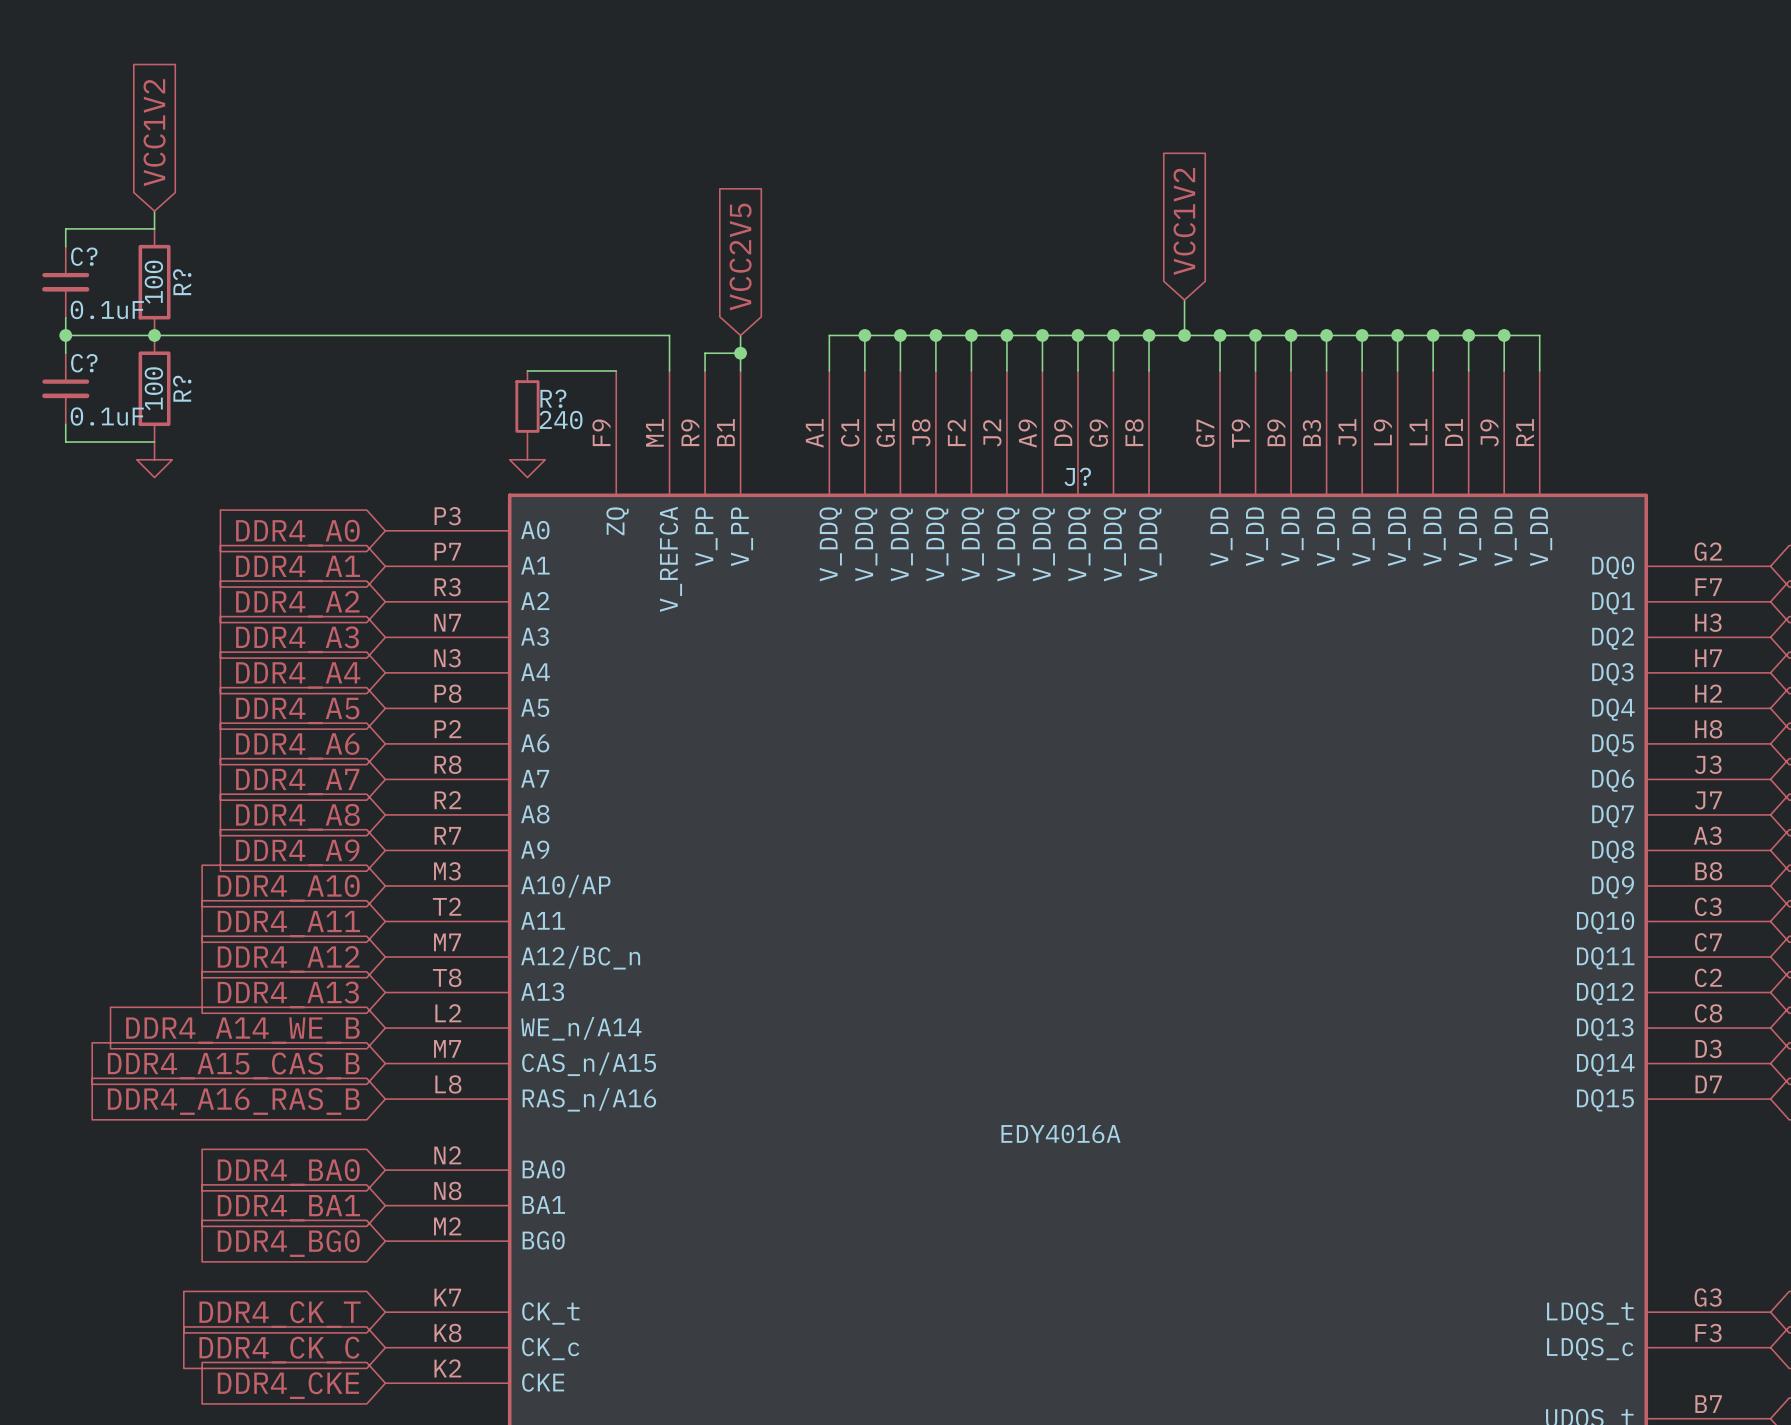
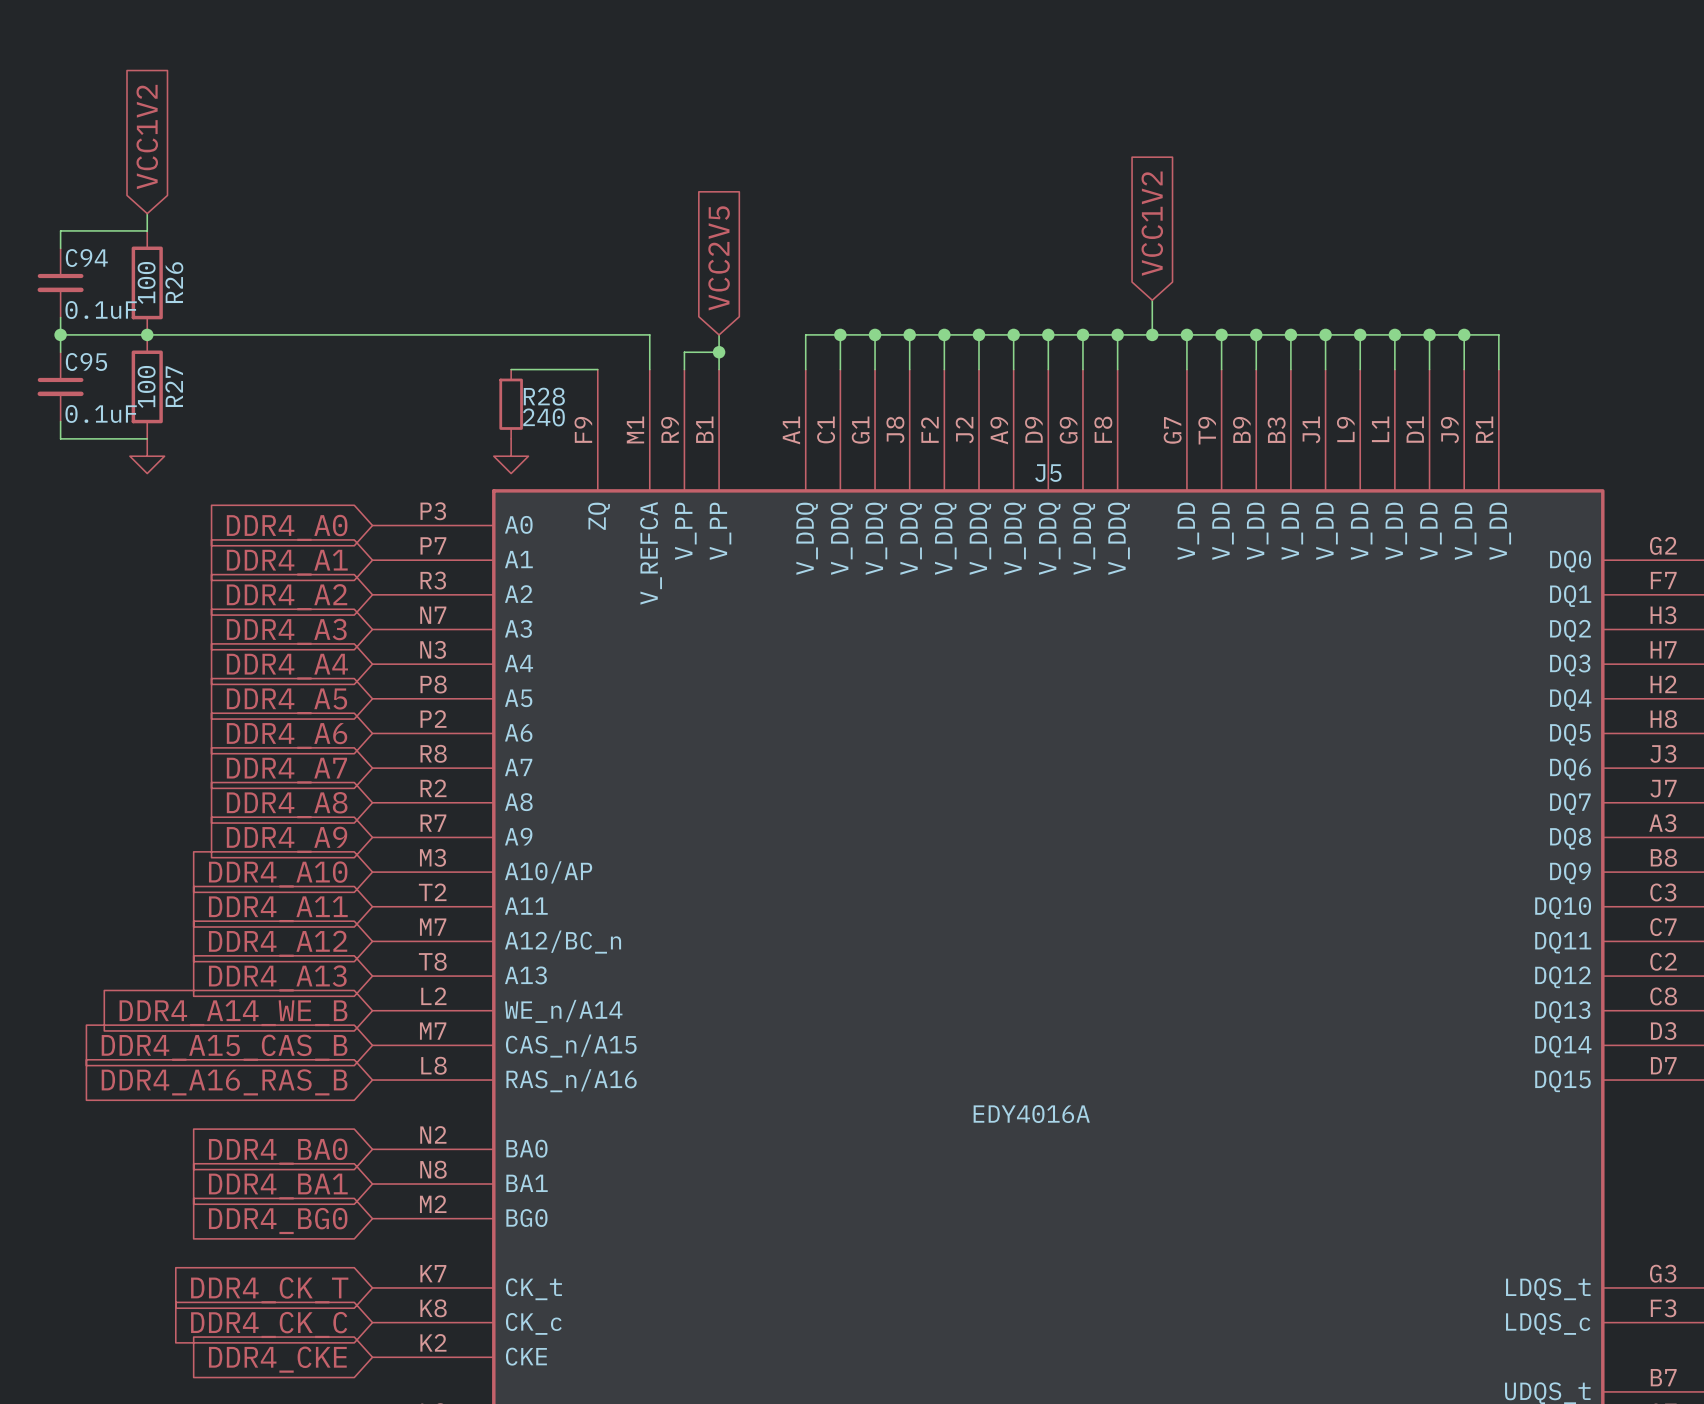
C? name: C? (84, 256) -> C94 (86, 258)
R? name: R? (182, 282) -> R26 (174, 282)
C? name: C? (84, 363) -> C95 (86, 361)
R? name: R? (182, 388) -> R27 (174, 386)
R? name: R? (553, 398) -> R28 (544, 396)
J? name: J? (1077, 476) -> J5 (1048, 473)

